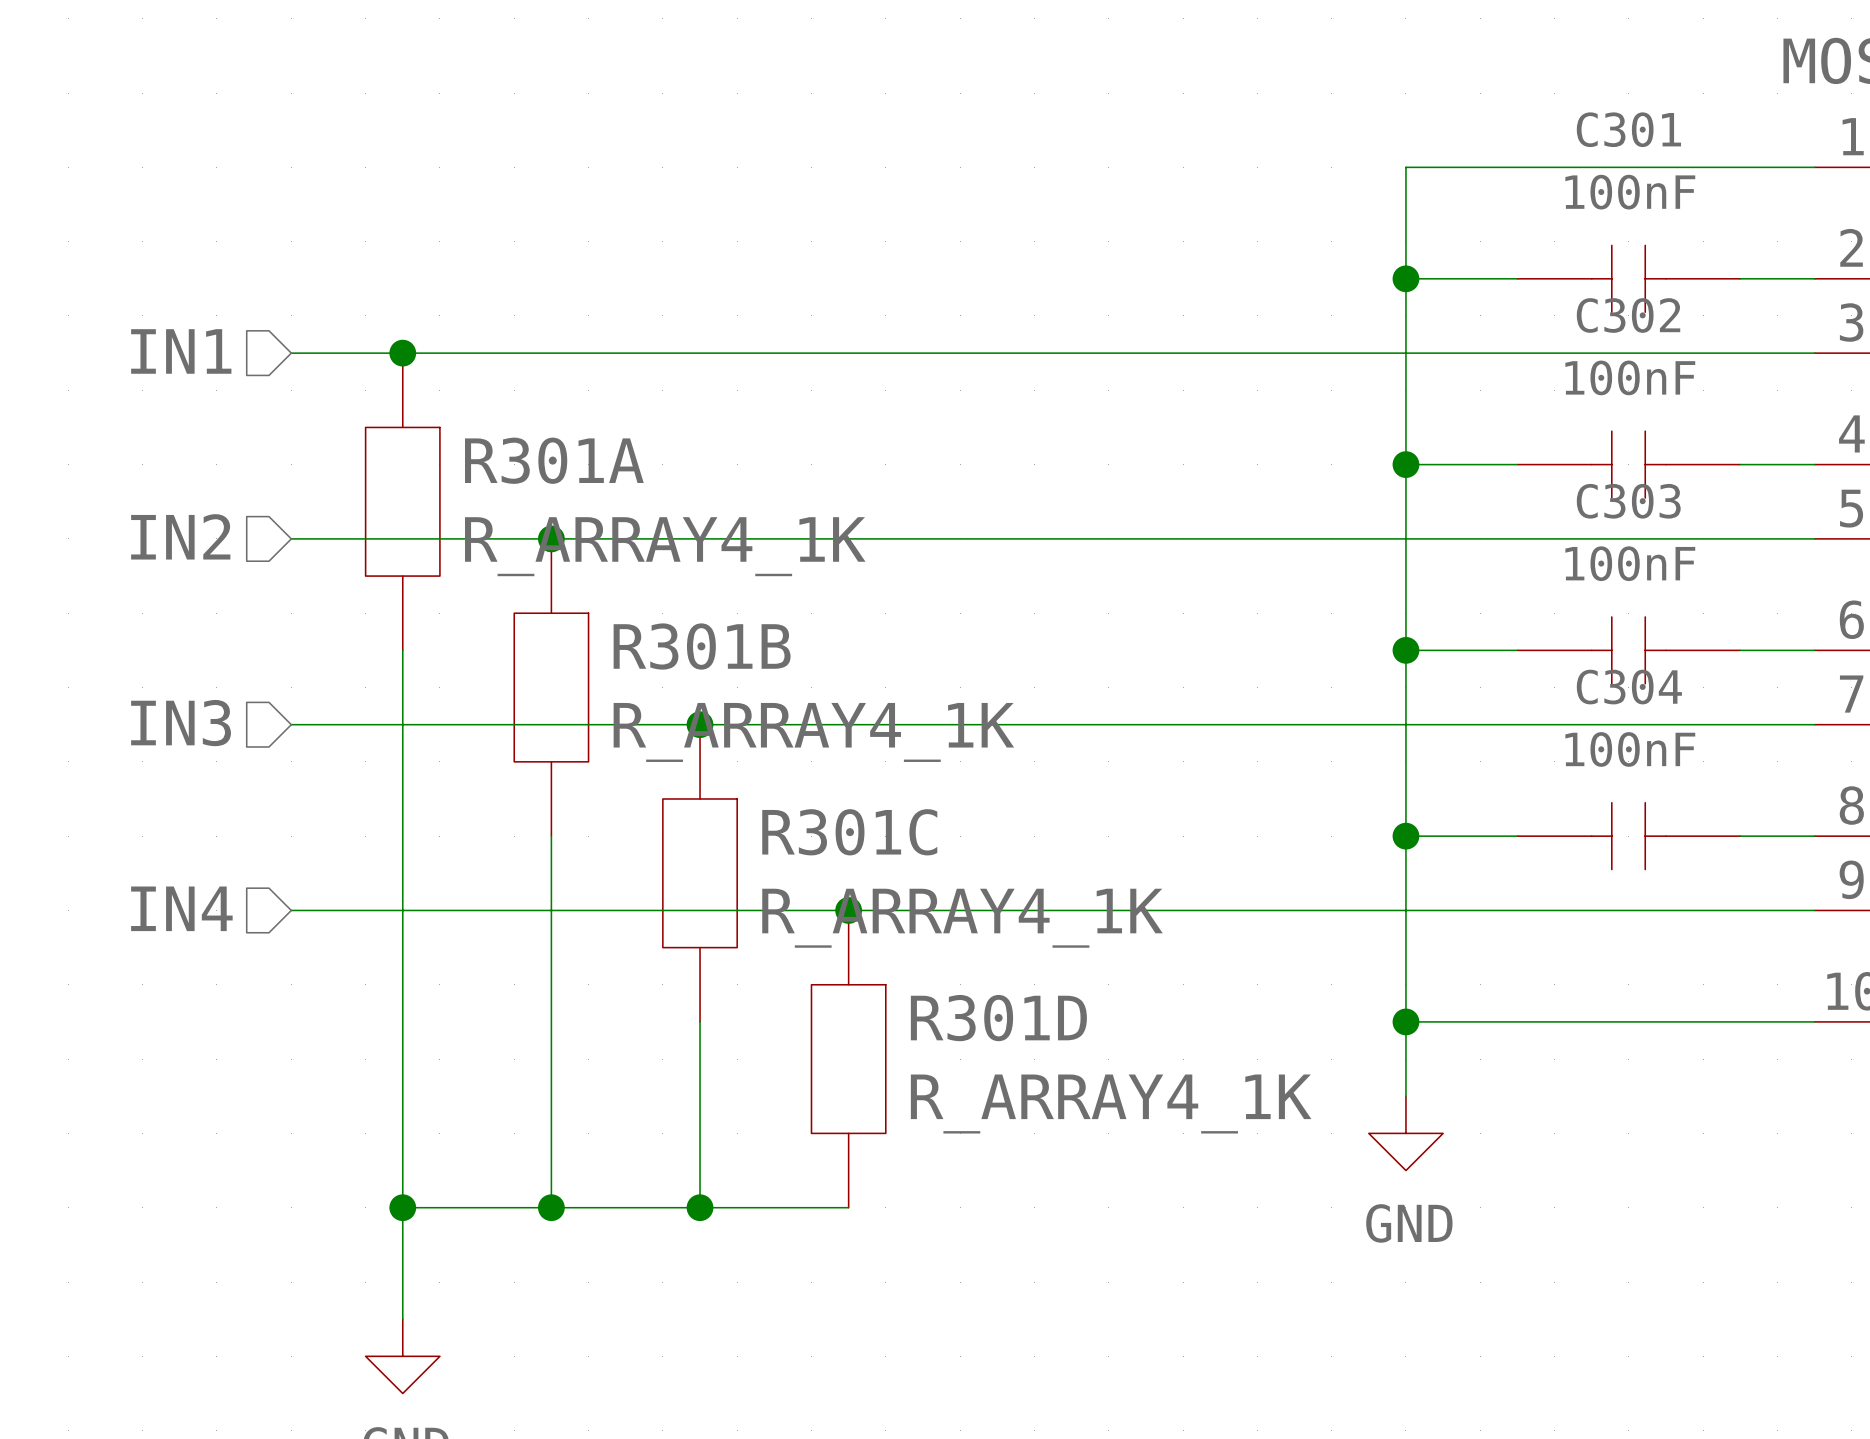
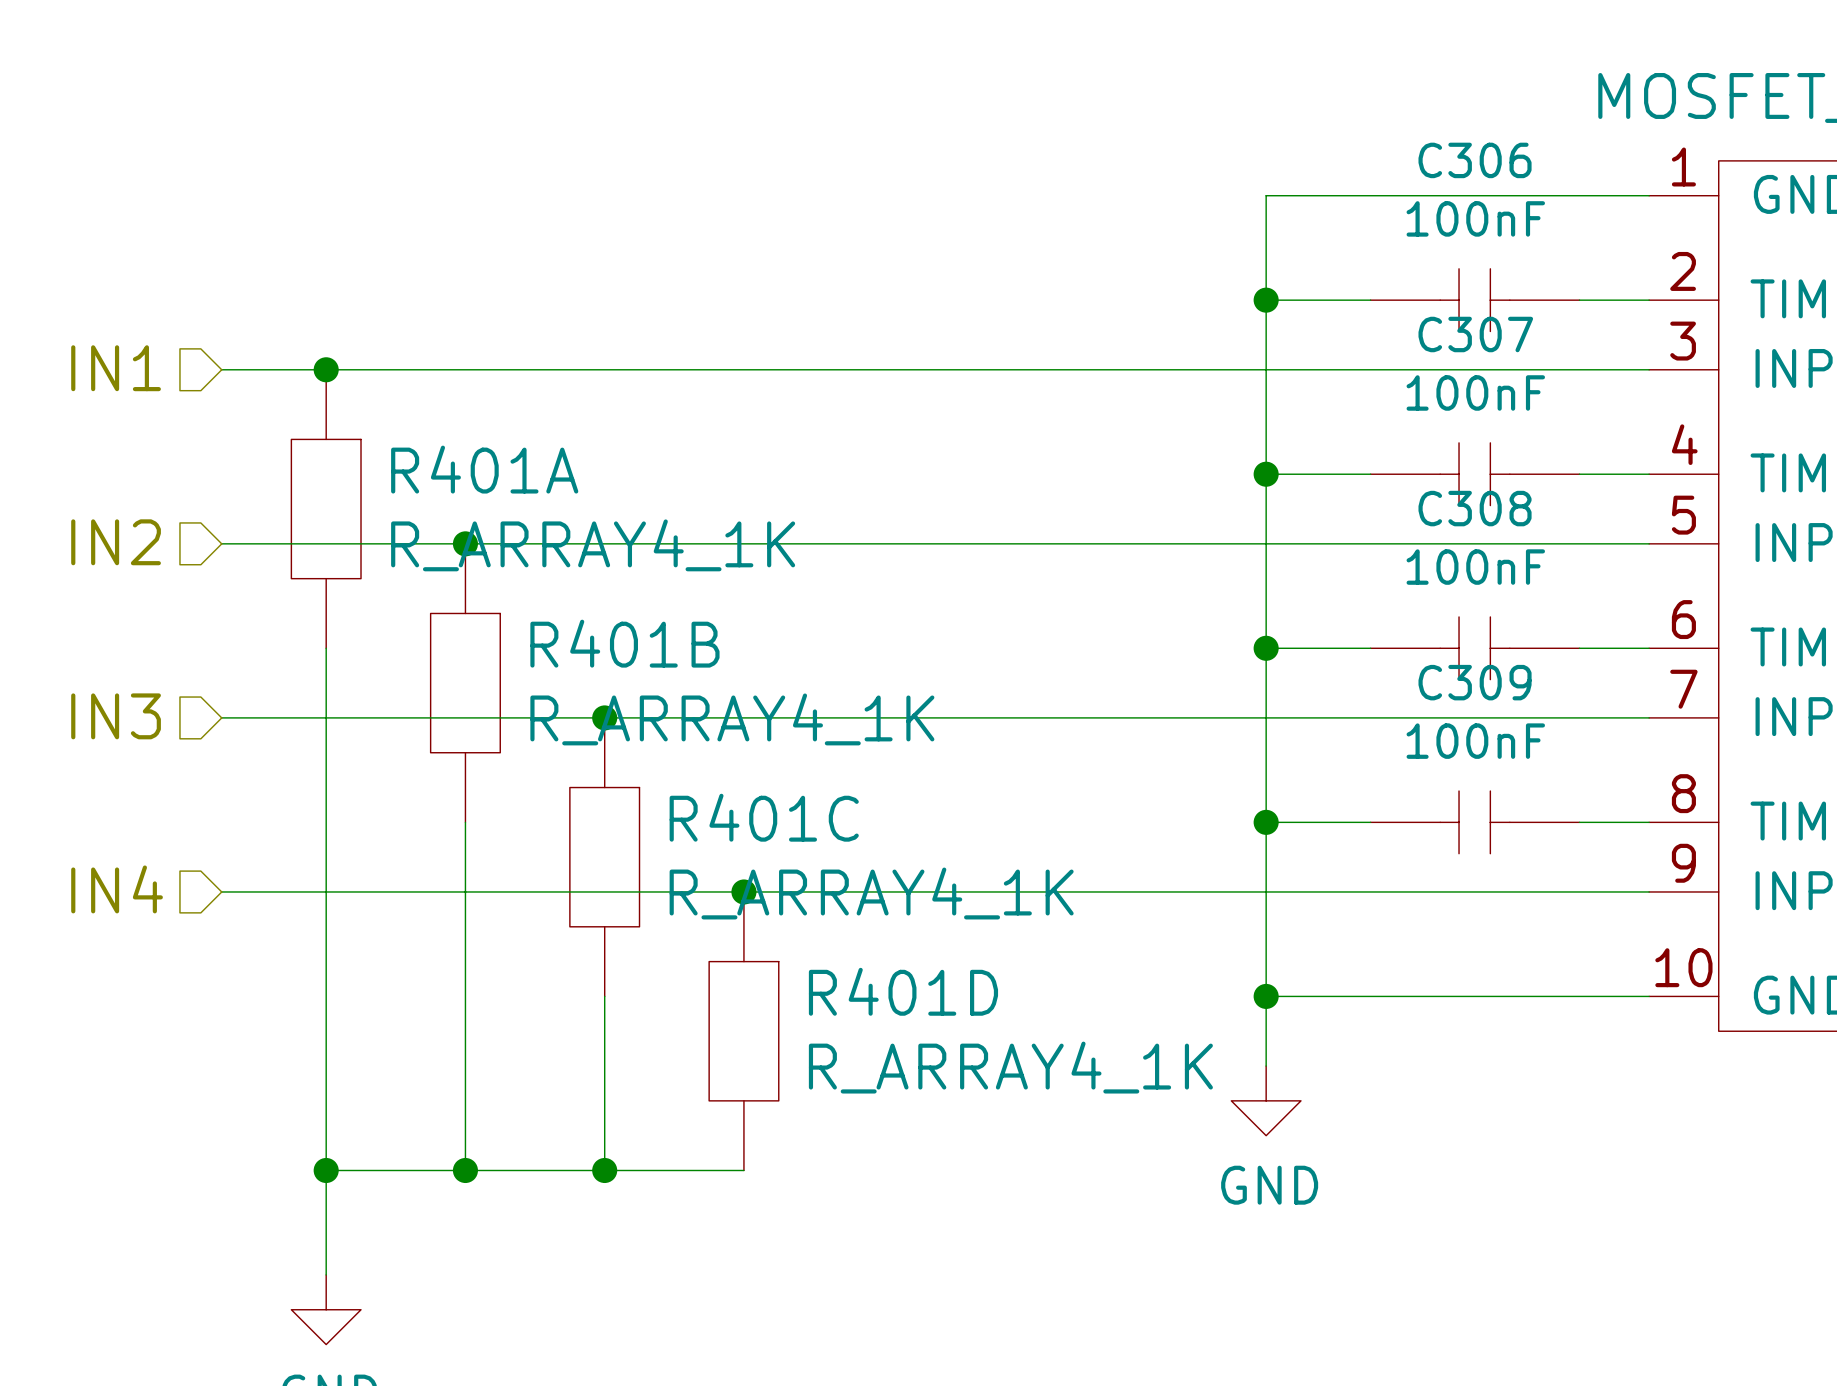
C301 name: C301 (1628, 129) -> C306 (1475, 160)
C302 name: C302 (1628, 315) -> C307 (1475, 334)
R301A name: R301A (554, 460) -> R401A (484, 469)
C303 name: C303 (1628, 501) -> C308 (1475, 508)
R301B name: R301B (702, 646) -> R401B (624, 643)
C304 name: C304 (1629, 687) -> C309 (1475, 682)
R301C name: R301C (849, 832) -> R401C (764, 817)
R301D name: R301D (998, 1018) -> R401D (903, 991)

